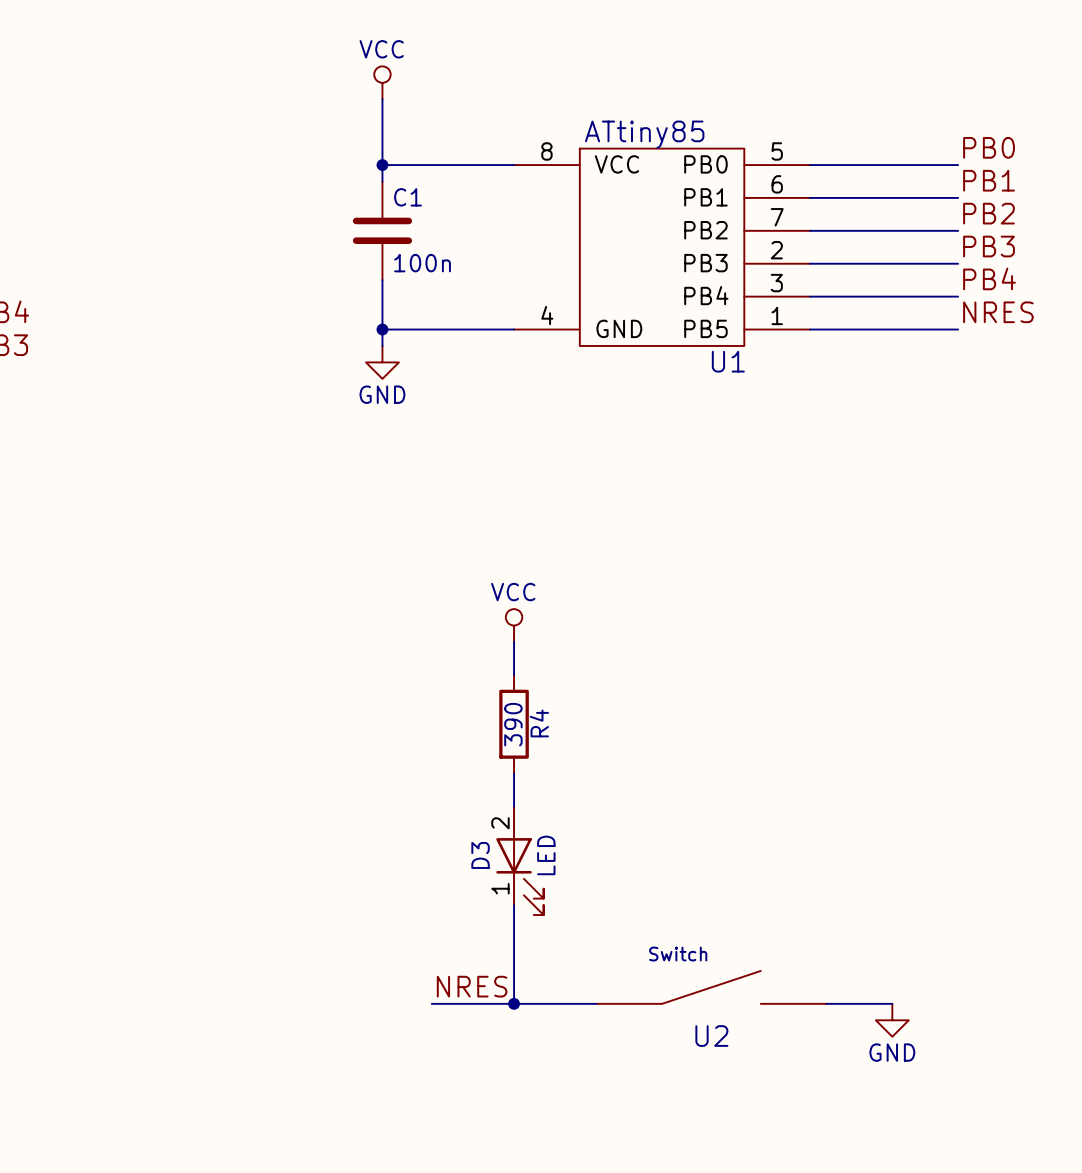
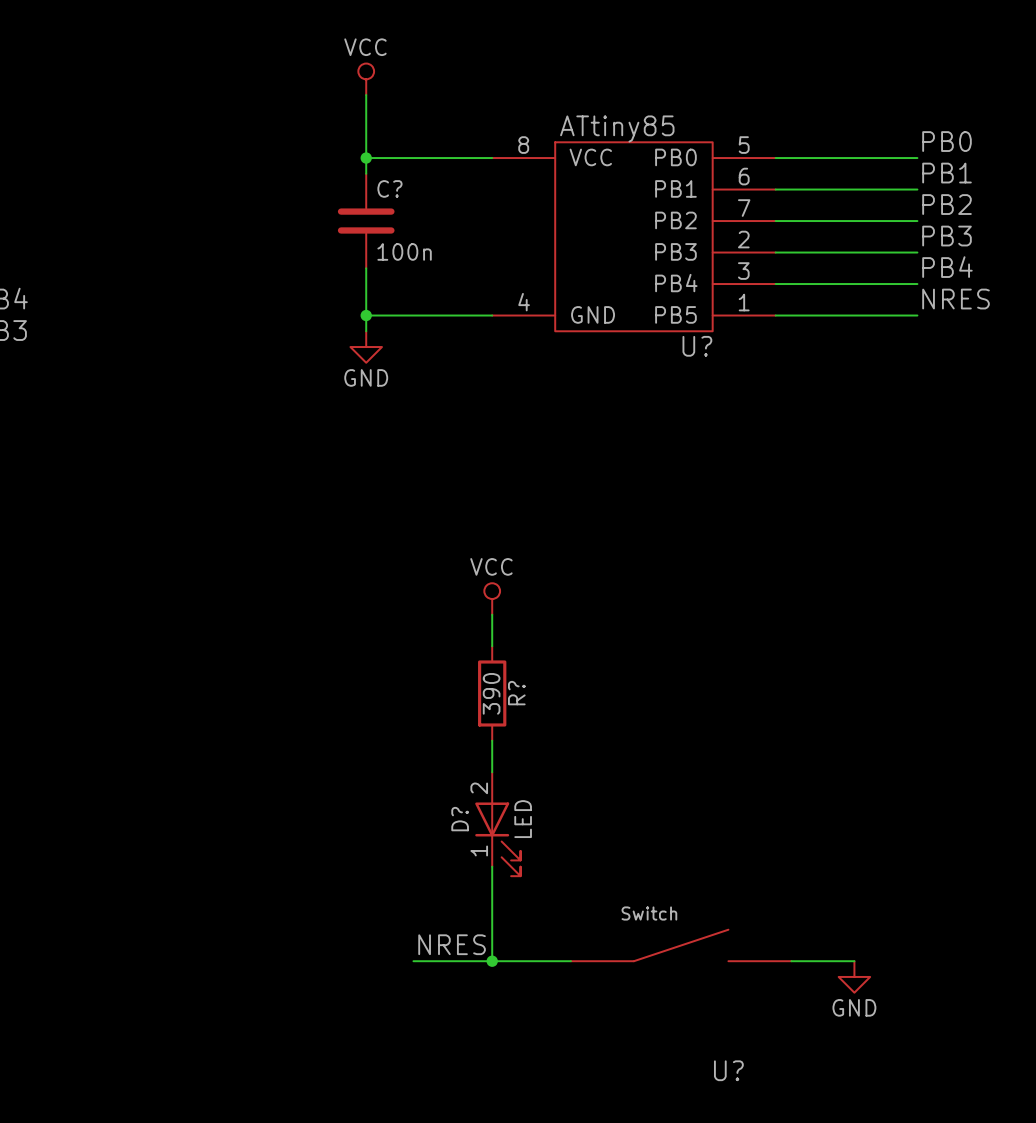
C1 name: C1 (408, 197) -> C? (389, 188)
U1 name: U1 (728, 361) -> U? (697, 346)
R4 name: R4 (539, 723) -> R? (516, 693)
D3 name: D3 (480, 855) -> D? (460, 819)
U2 name: U2 (711, 1036) -> U? (728, 1070)

